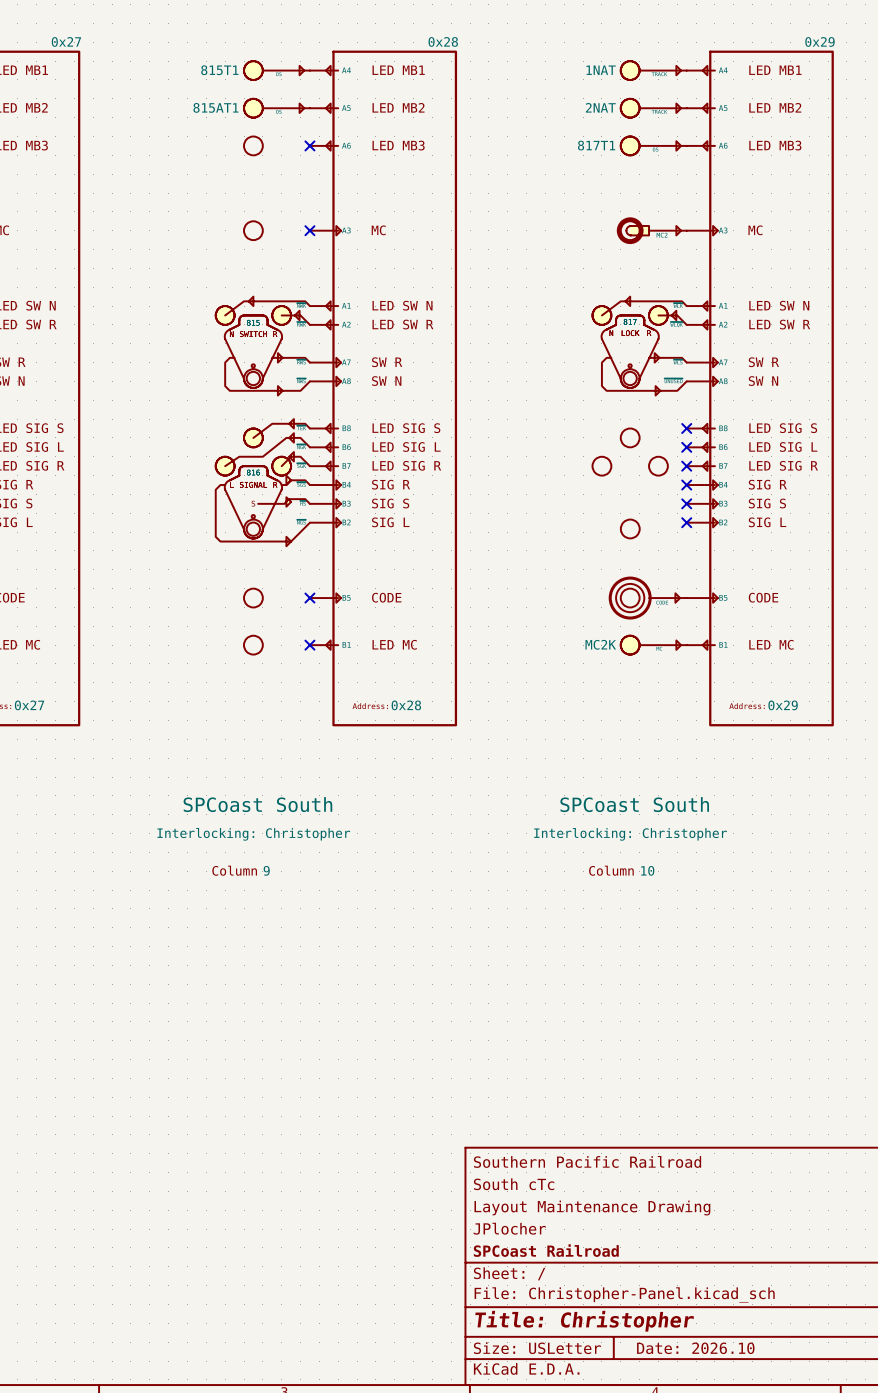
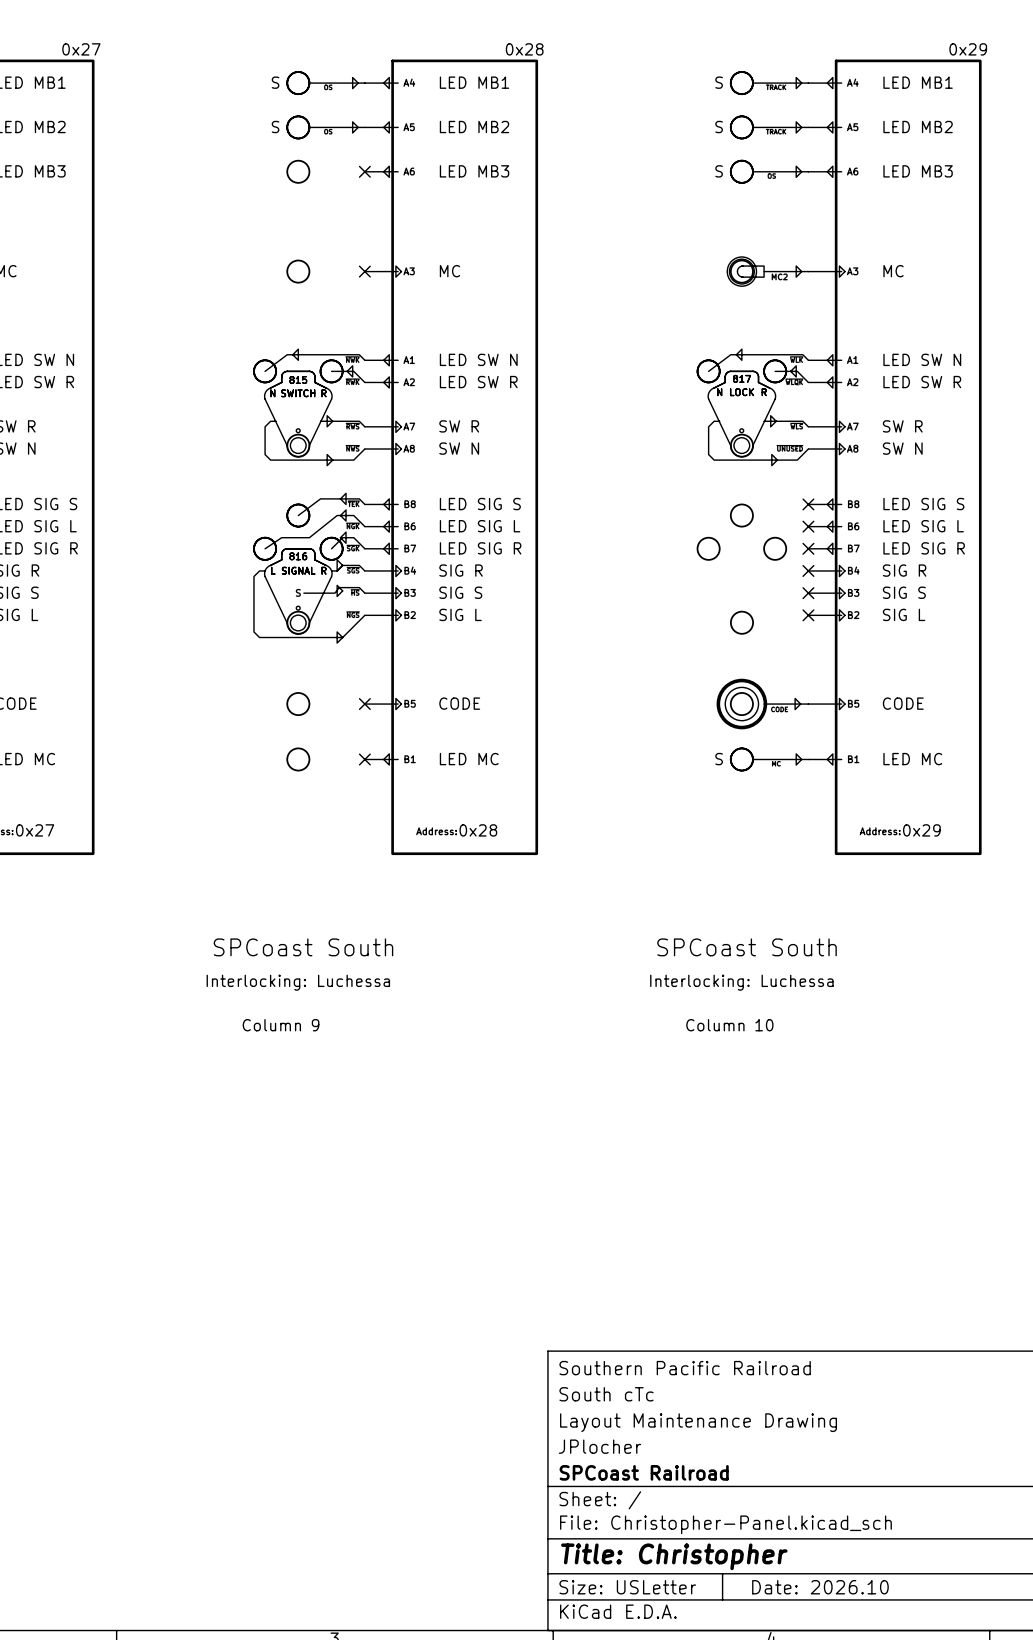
part text: 815T1 (219, 70) -> S (275, 82)
part text: 1NAT (601, 70) -> S (719, 82)
part text: 815AT1 (215, 107) -> S (275, 127)
part text: 2NAT (600, 107) -> S (719, 127)
part text: 817T1 (596, 145) -> S (719, 171)
part text: MC2K (600, 644) -> S (719, 759)
part text: Interlocking: Christopher (253, 834) -> Interlocking: Luchessa (298, 982)
part text: Interlocking: Christopher (630, 834) -> Interlocking: Luchessa (741, 982)

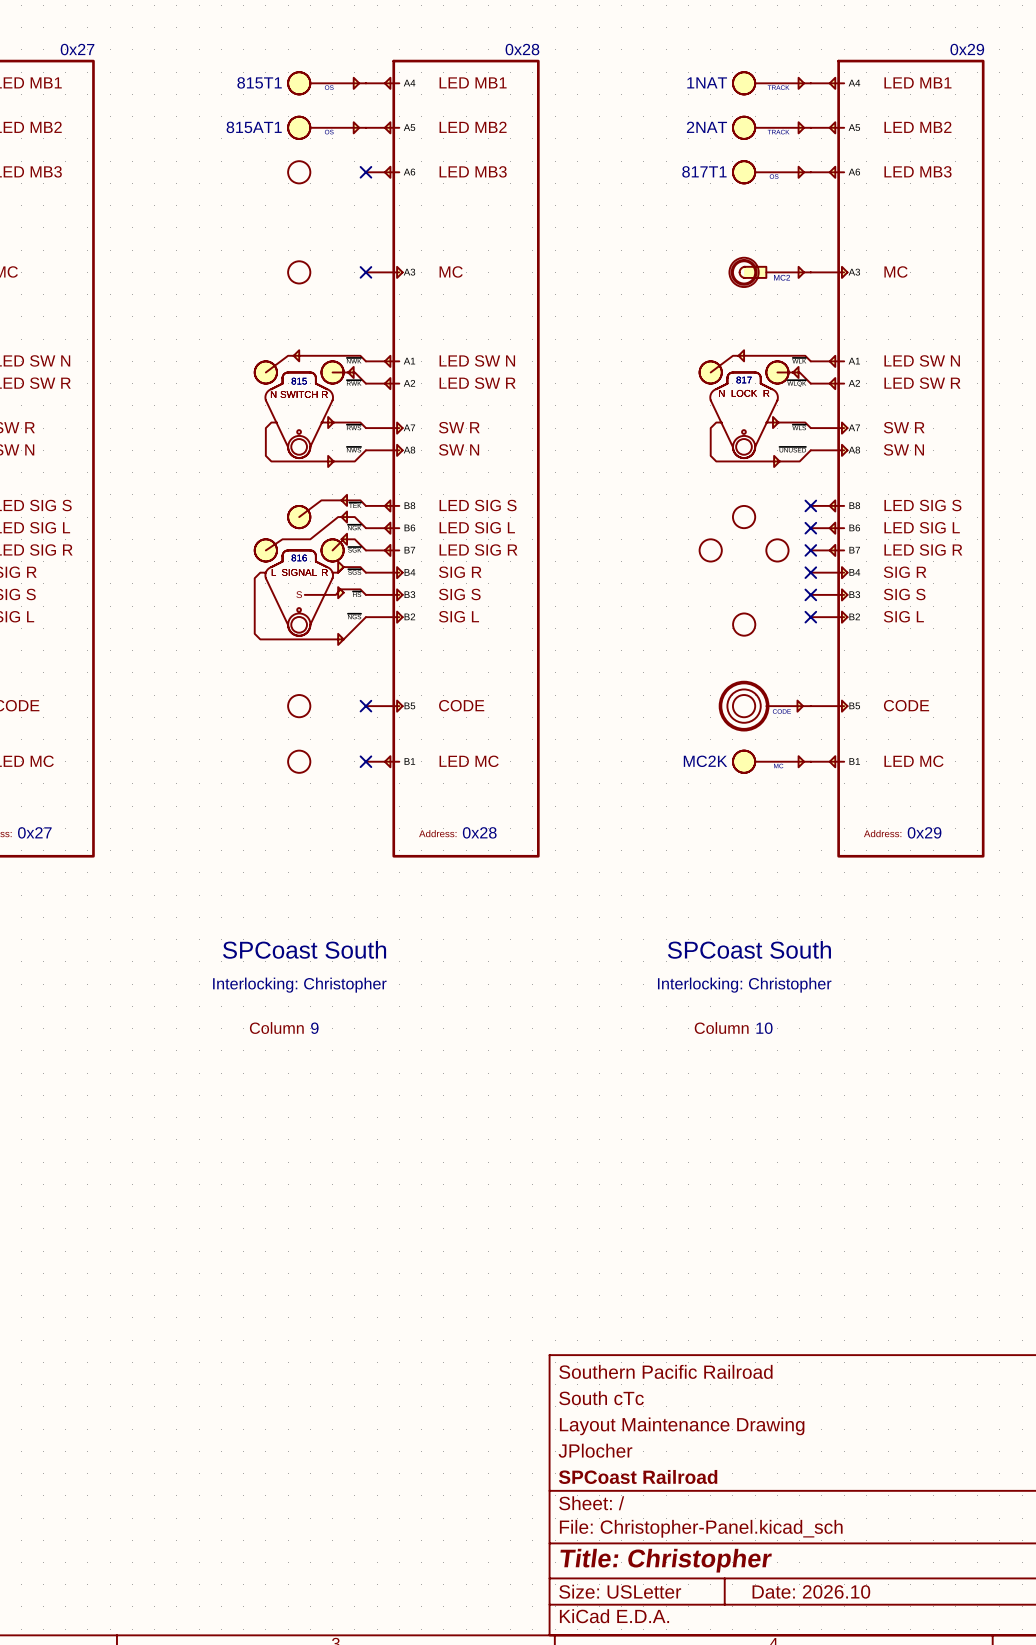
part text: S (275, 82) -> 815T1 (259, 82)
part text: S (719, 82) -> 1NAT (707, 82)
part text: S (275, 127) -> 815AT1 (254, 127)
part text: S (719, 127) -> 2NAT (706, 127)
part text: S (719, 171) -> 817T1 (704, 171)
part text: S (719, 759) -> MC2K (705, 761)
part text: Interlocking: Luchessa (298, 982) -> Interlocking: Christopher (299, 985)
part text: Interlocking: Luchessa (741, 982) -> Interlocking: Christopher (744, 985)

